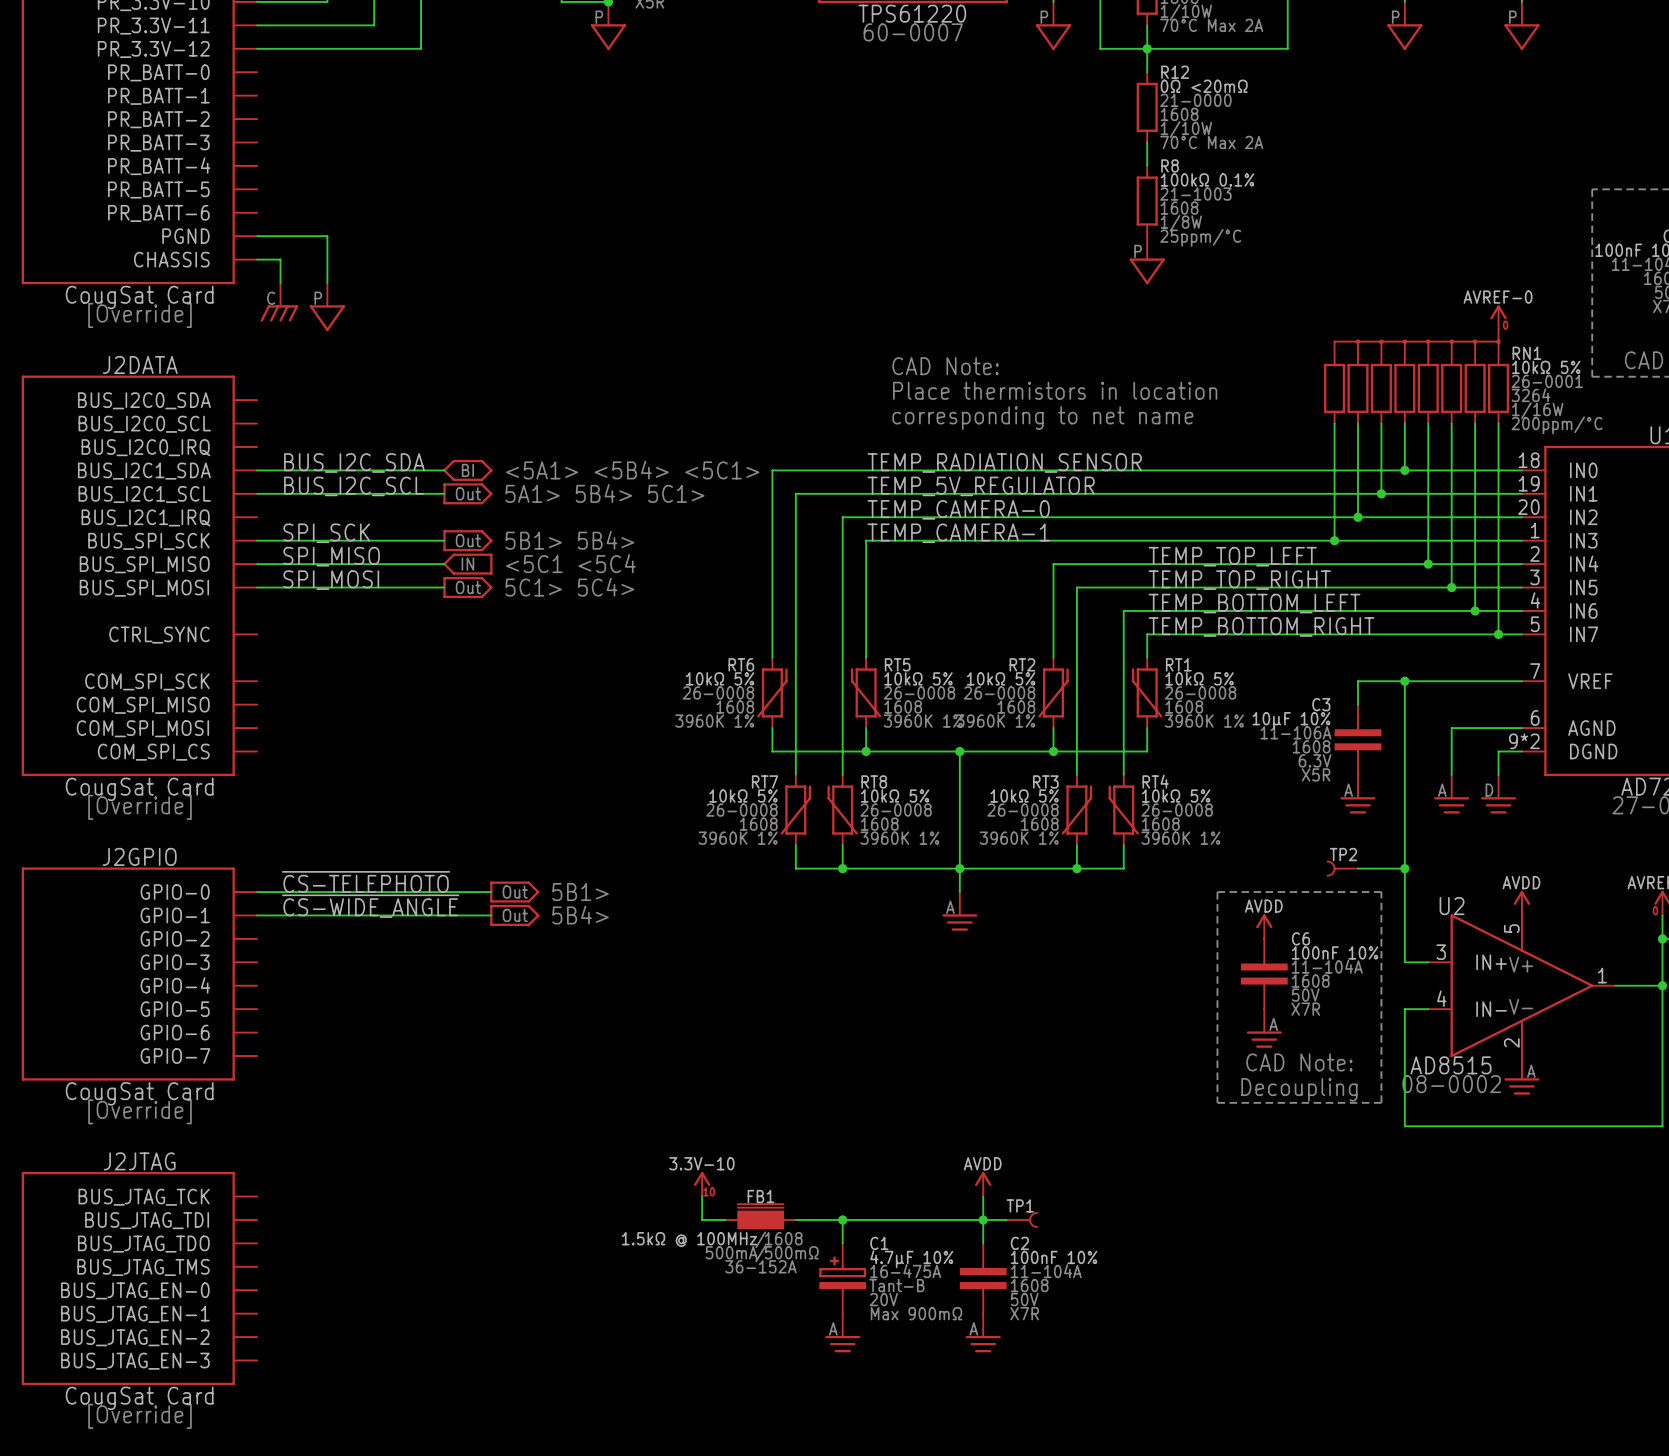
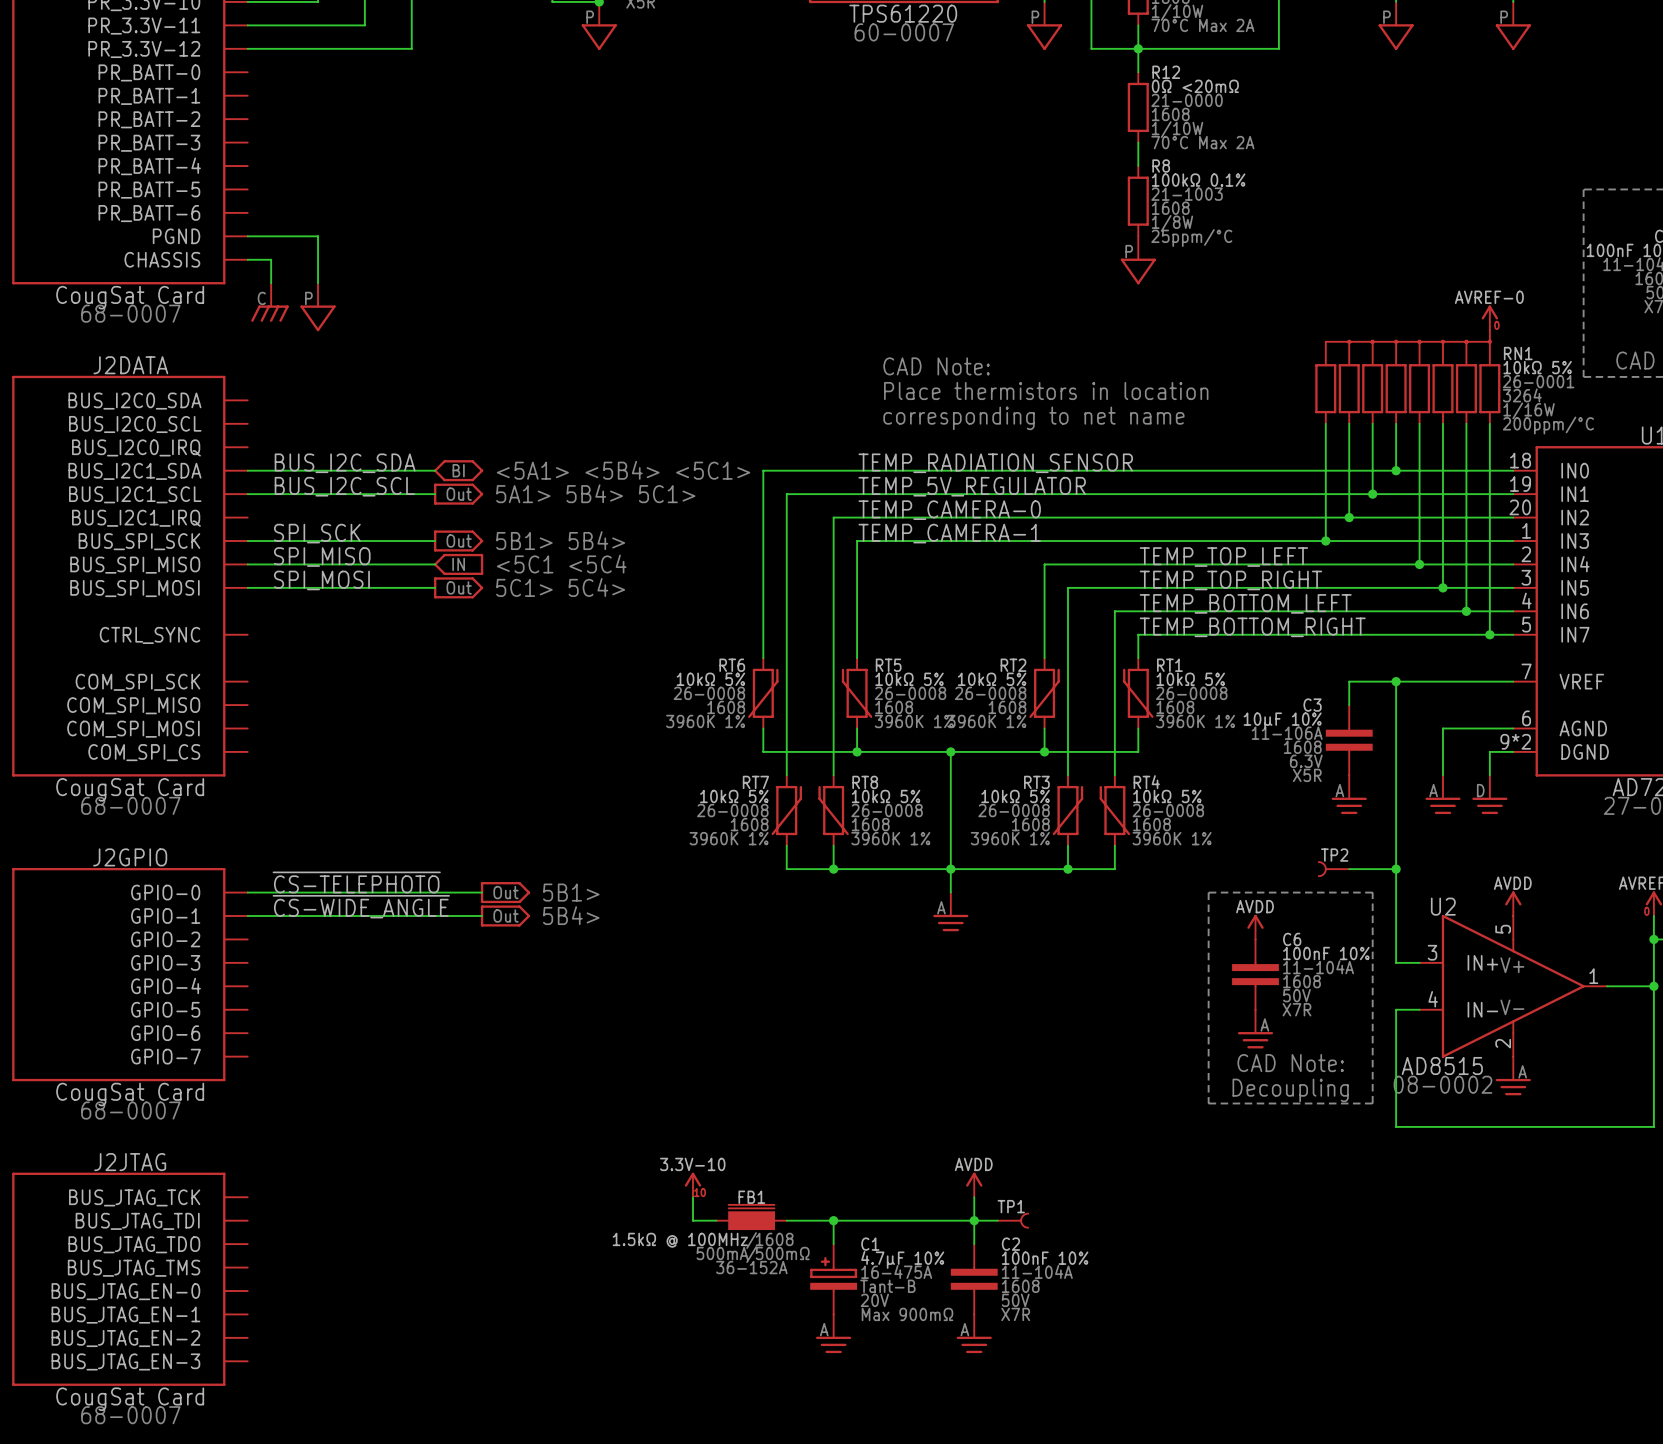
part text: [Override] (139, 315) -> 68-0007 (130, 313)
J2DATA text: [Override] (139, 807) -> 68-0007 (130, 805)
J2GPIO text: [Override] (139, 1111) -> 68-0007 (130, 1110)
J2JTAG text: [Override] (139, 1416) -> 68-0007 (130, 1415)

